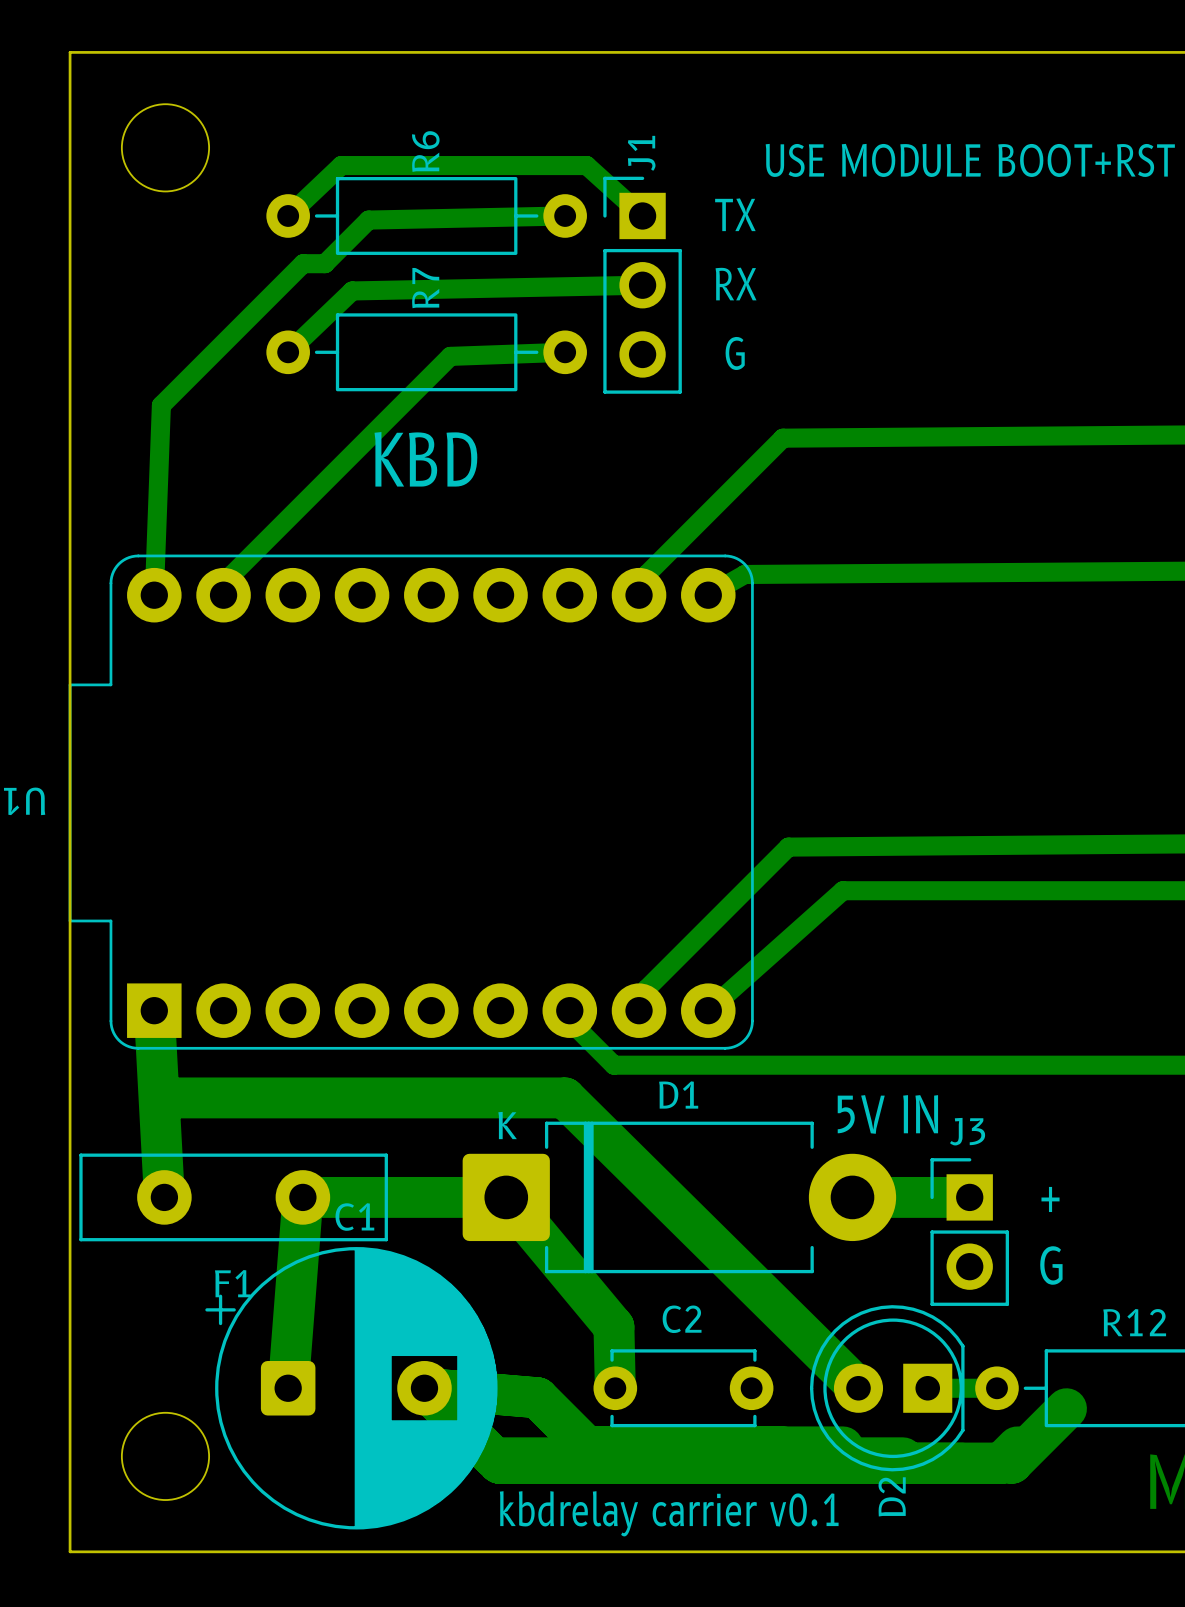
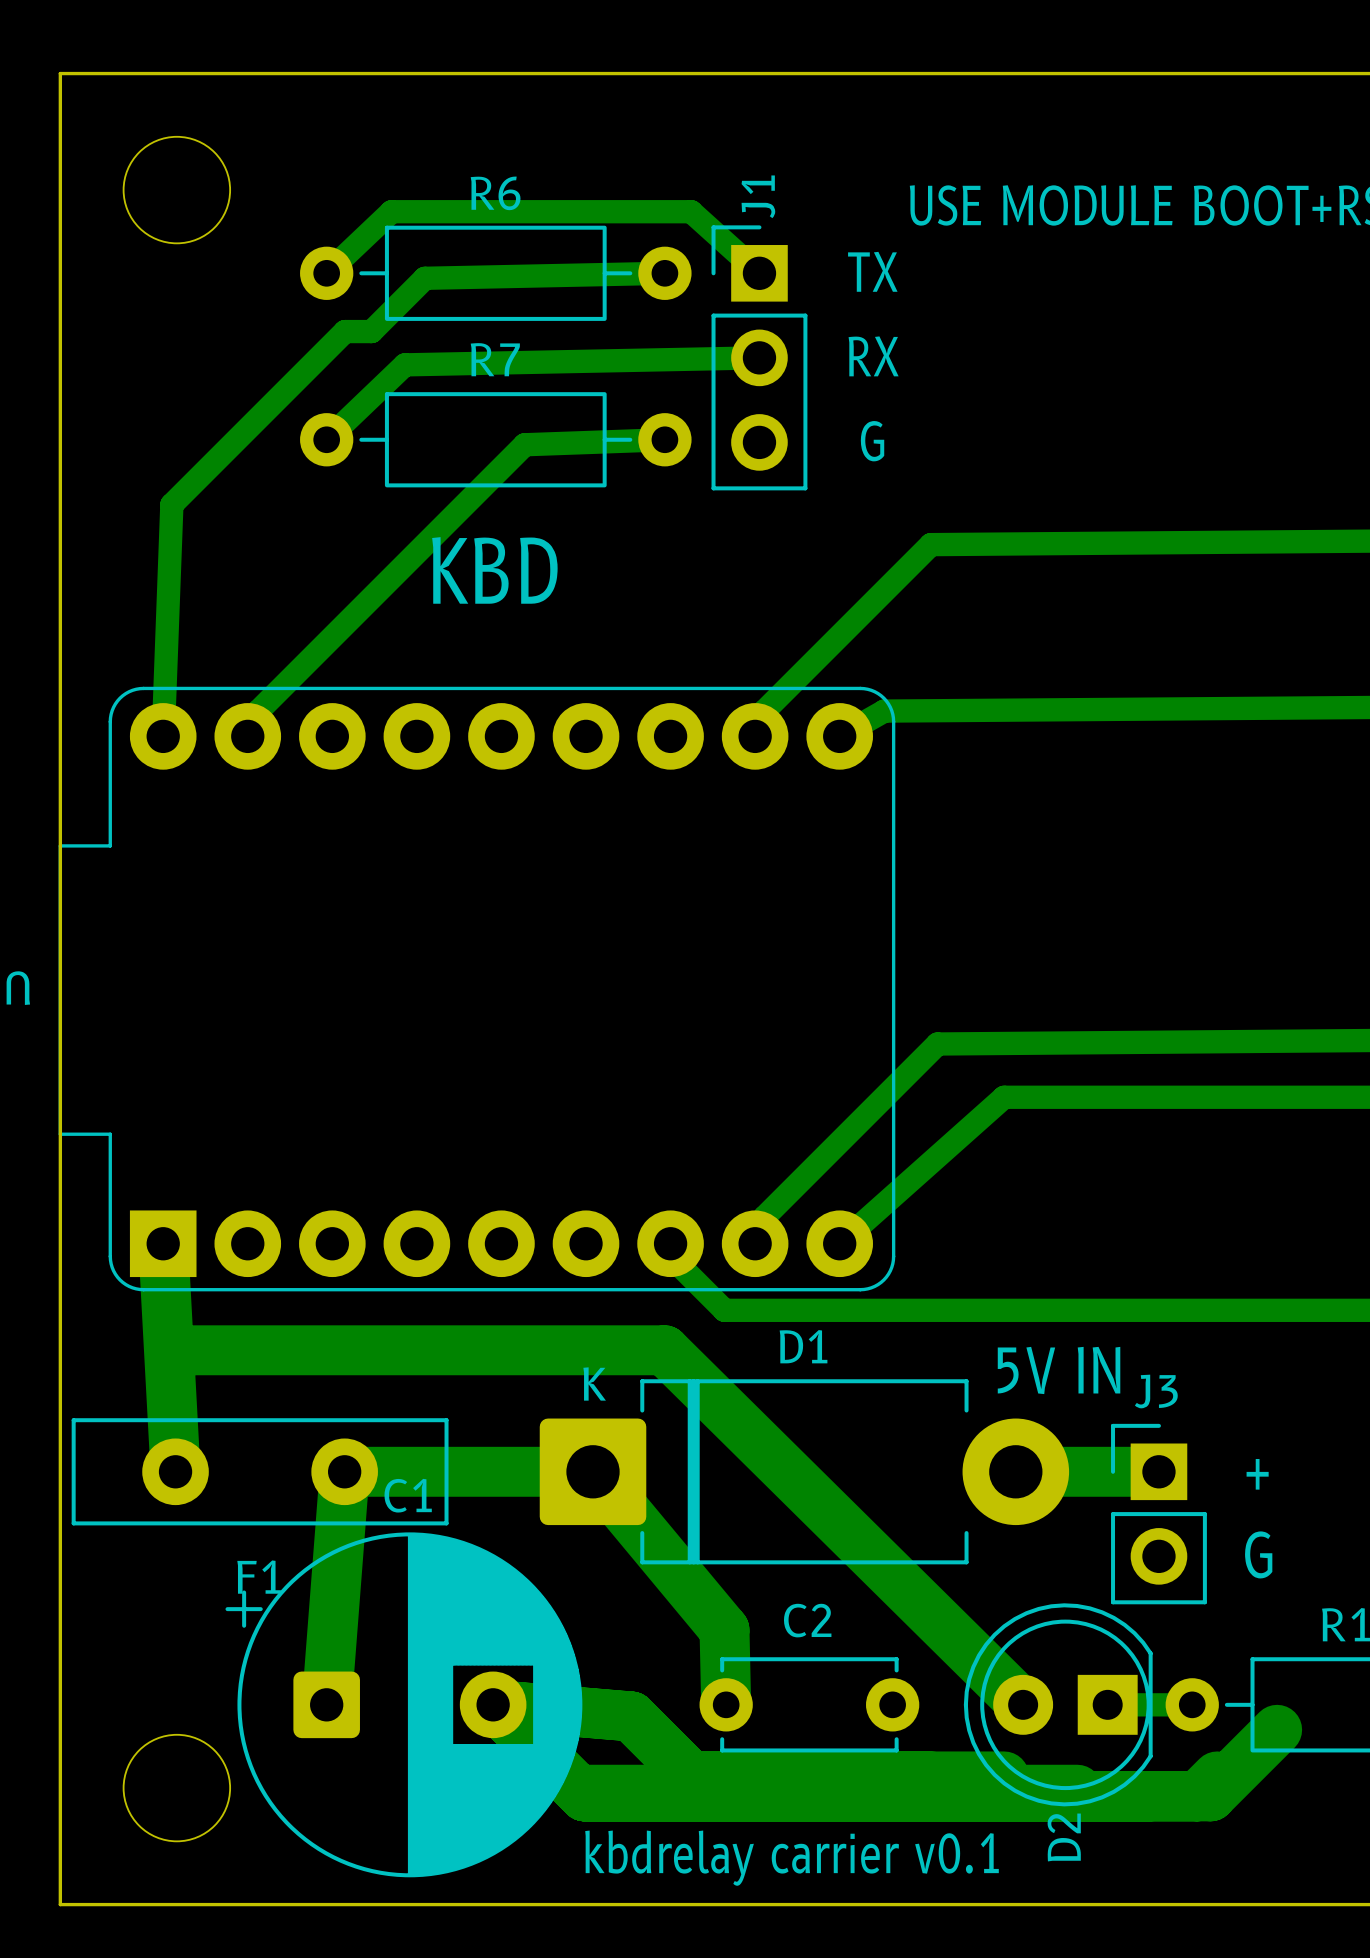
R6 name rotation: 0° (425, 151) -> 90° clockwise (495, 193)
R7 name rotation: 0° (425, 288) -> 90° clockwise (495, 359)

